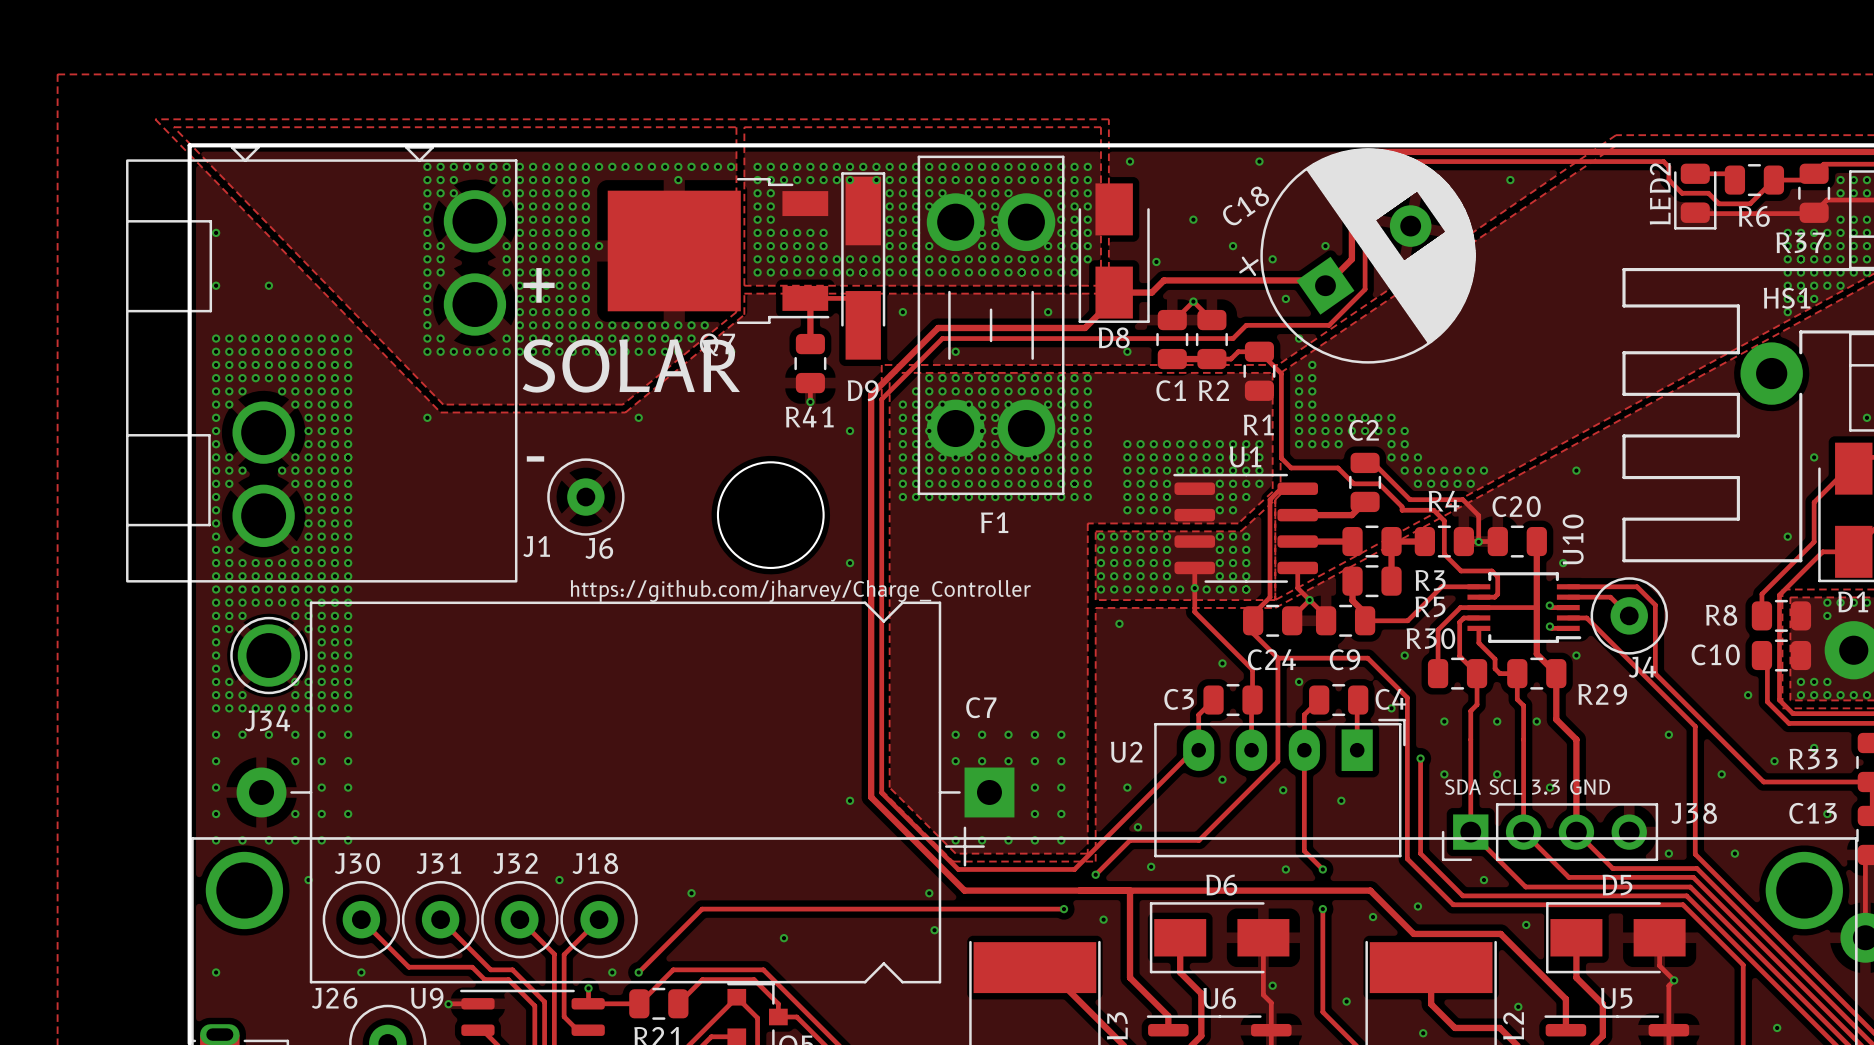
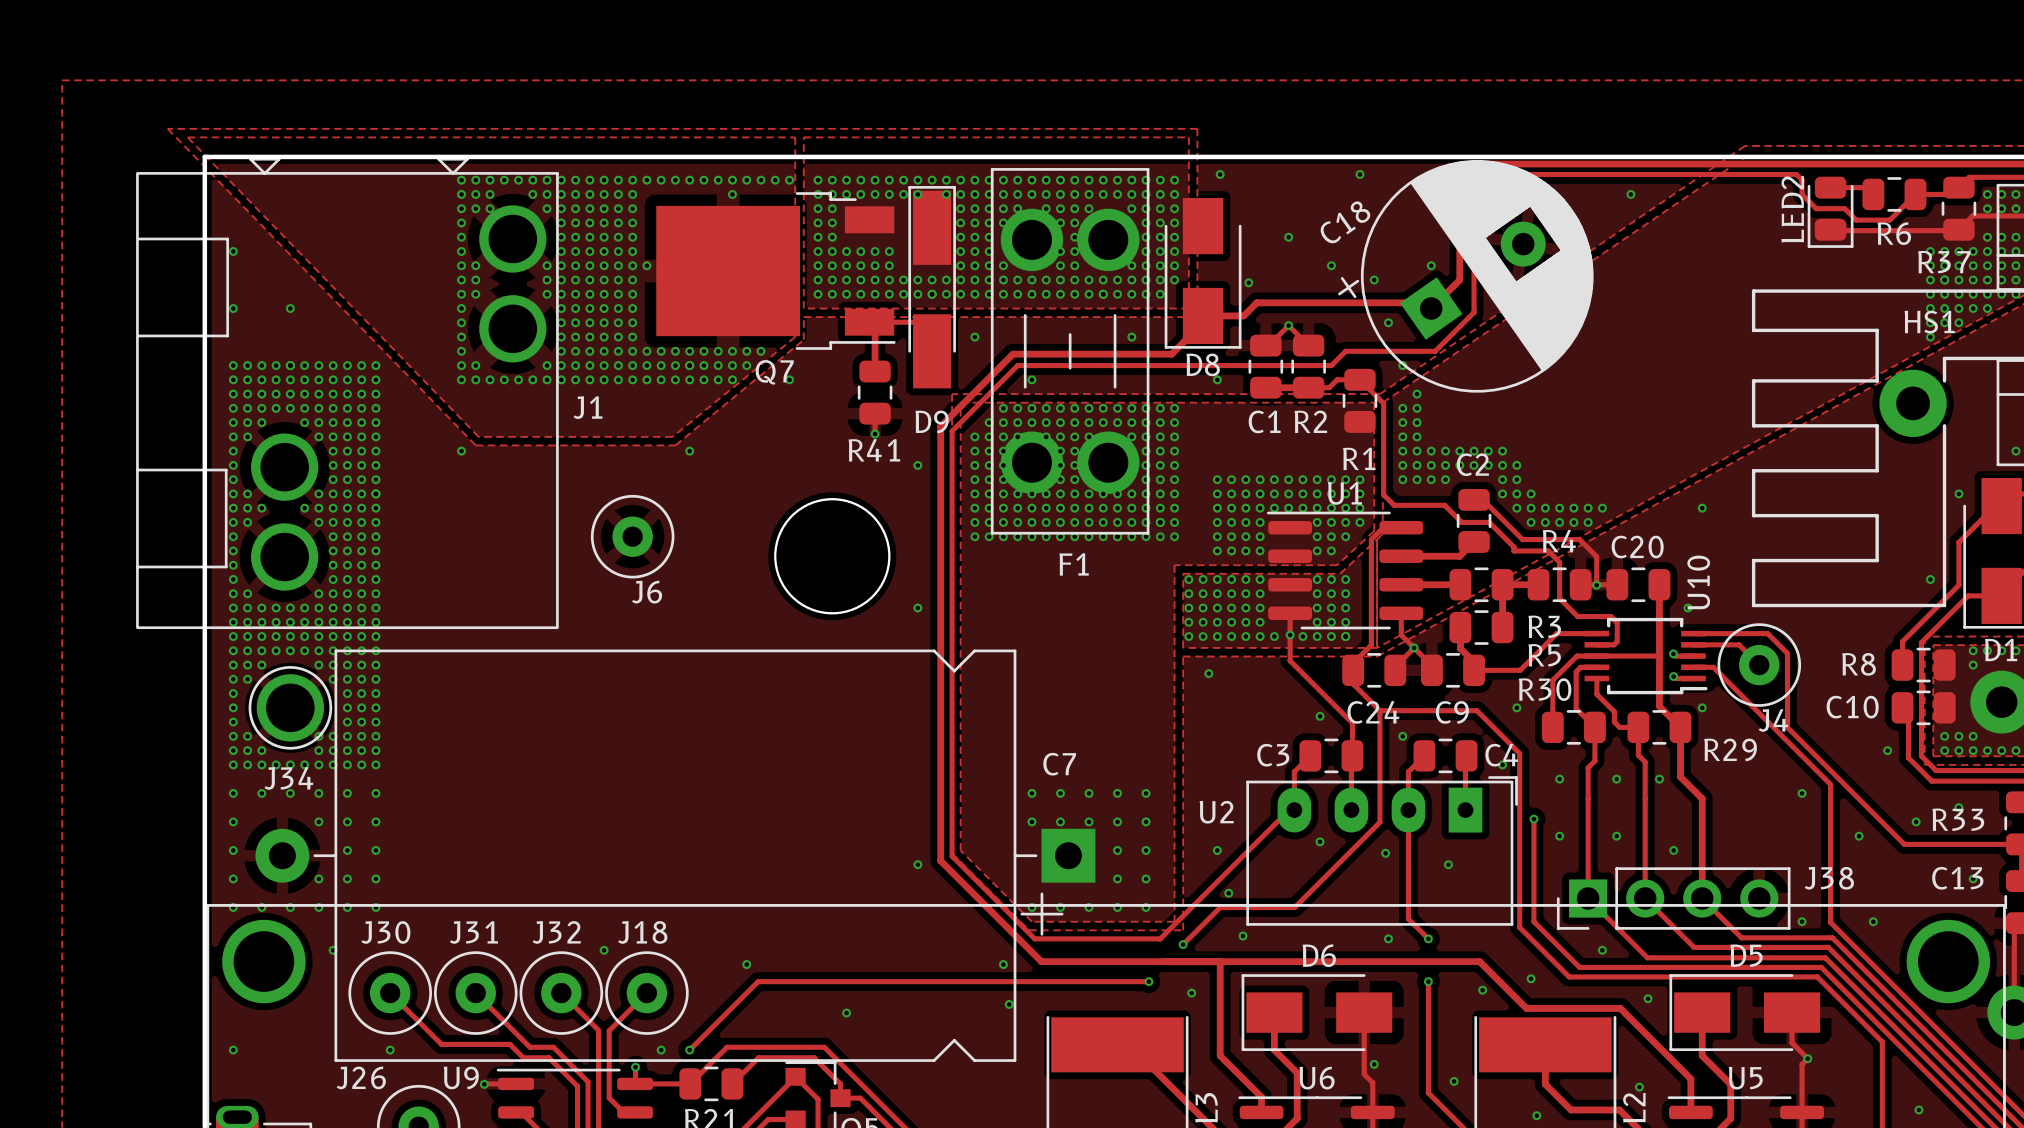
text: + (538, 285) -> none
text: SOLAR (631, 365) -> none
text: - (535, 458) -> none
J1 name position: J1 (536, 546) -> J1 (588, 407)
text: https://github.com/jharvey/Charge_Controller (800, 591) -> none
text: SDA SCL 3.3 GND (1527, 787) -> none

